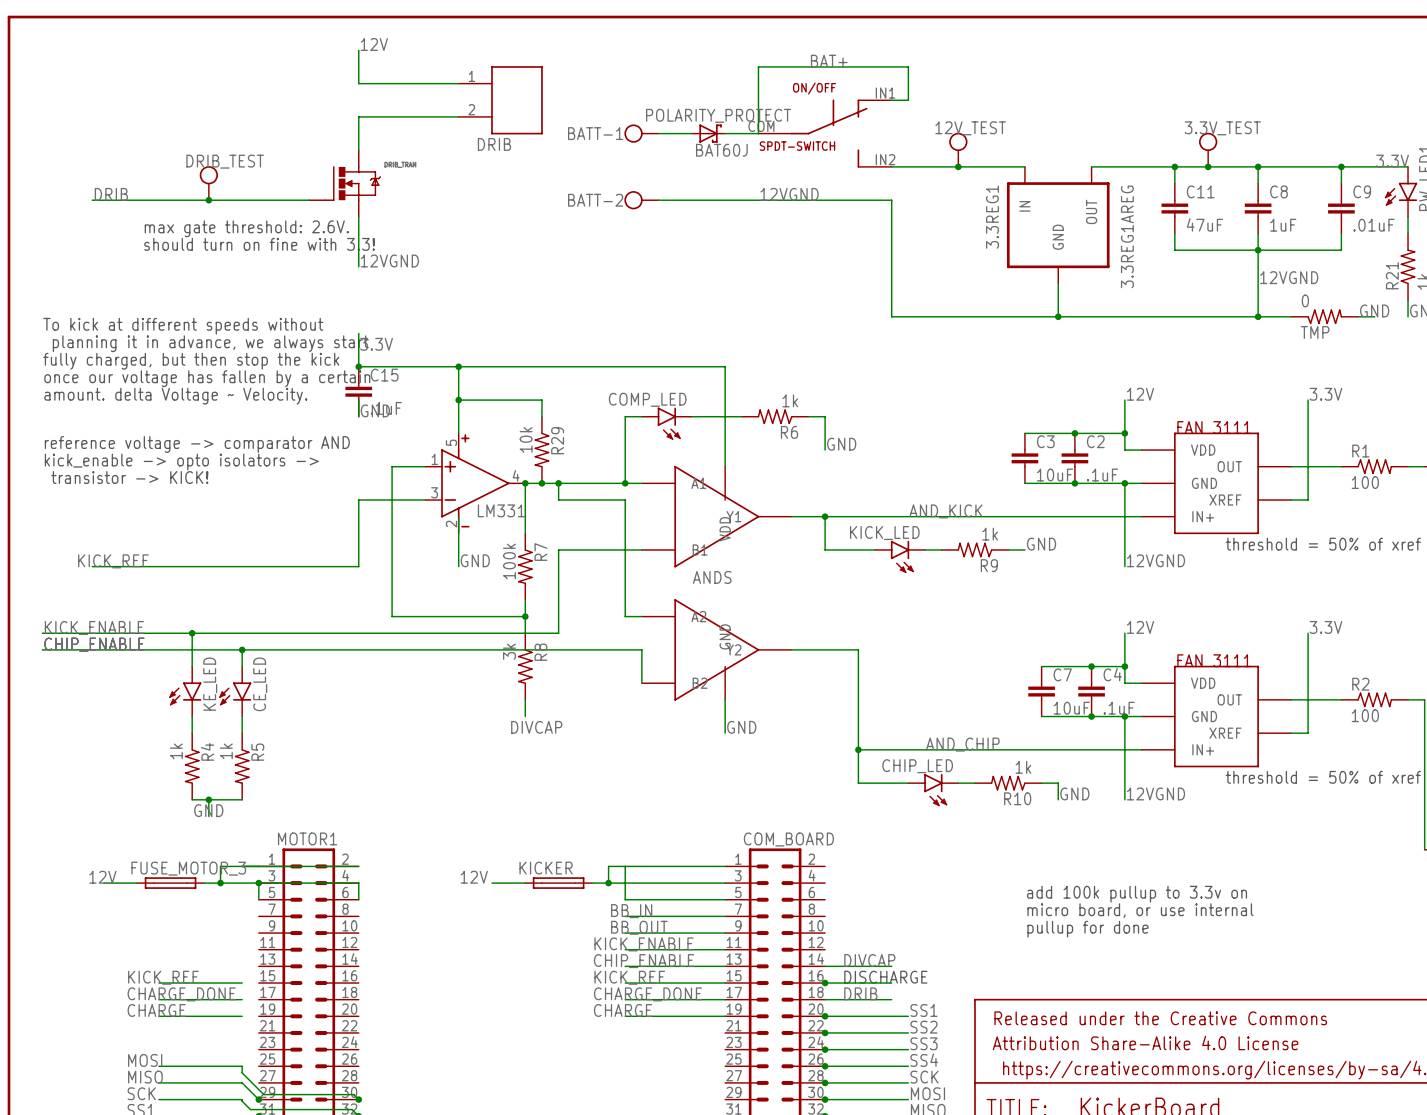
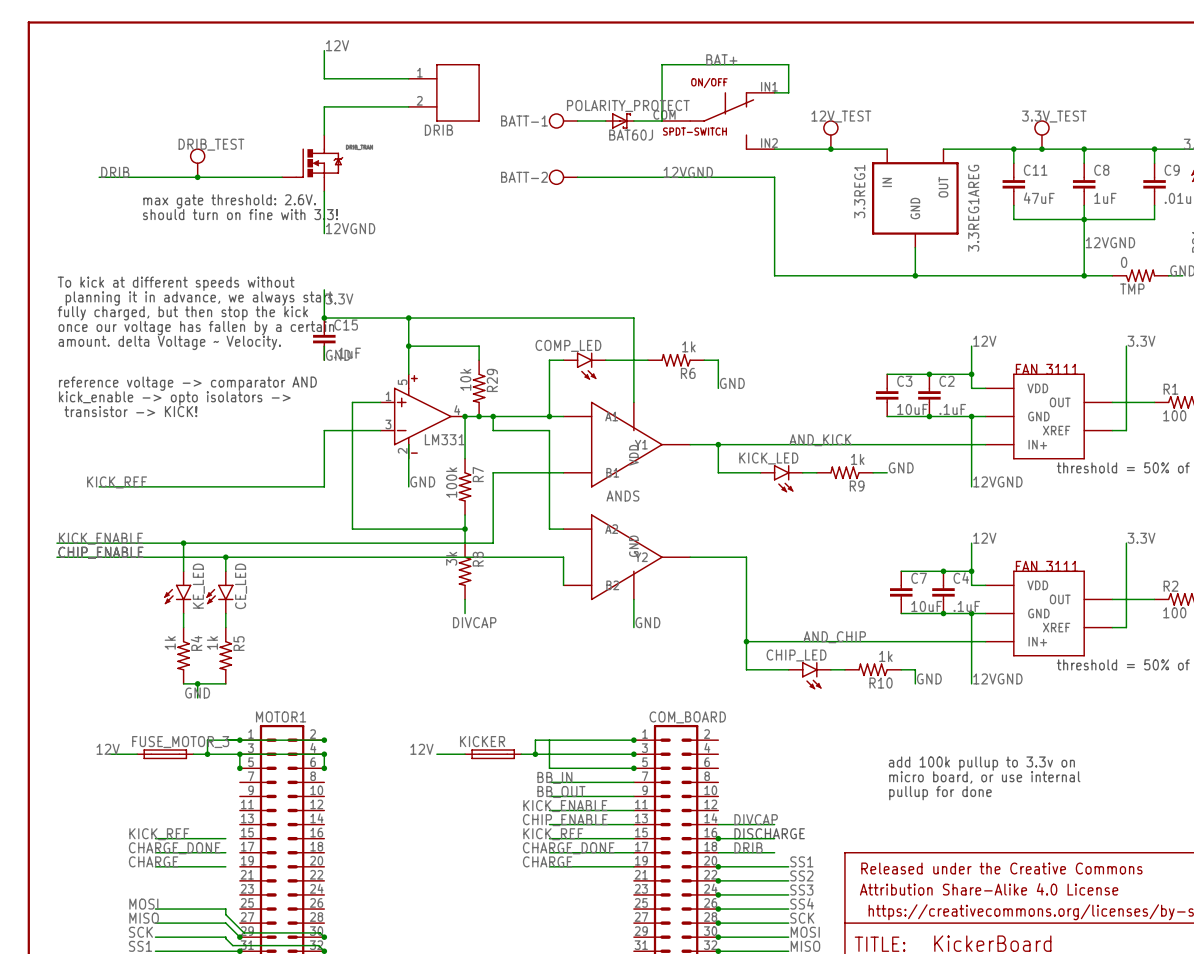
junction: none -> (239, 740)
junction: none -> (324, 740)
junction: none -> (633, 740)
junction: none -> (324, 754)
junction: none -> (633, 754)
junction: none -> (239, 768)
junction: none -> (324, 768)
junction: none -> (633, 768)

